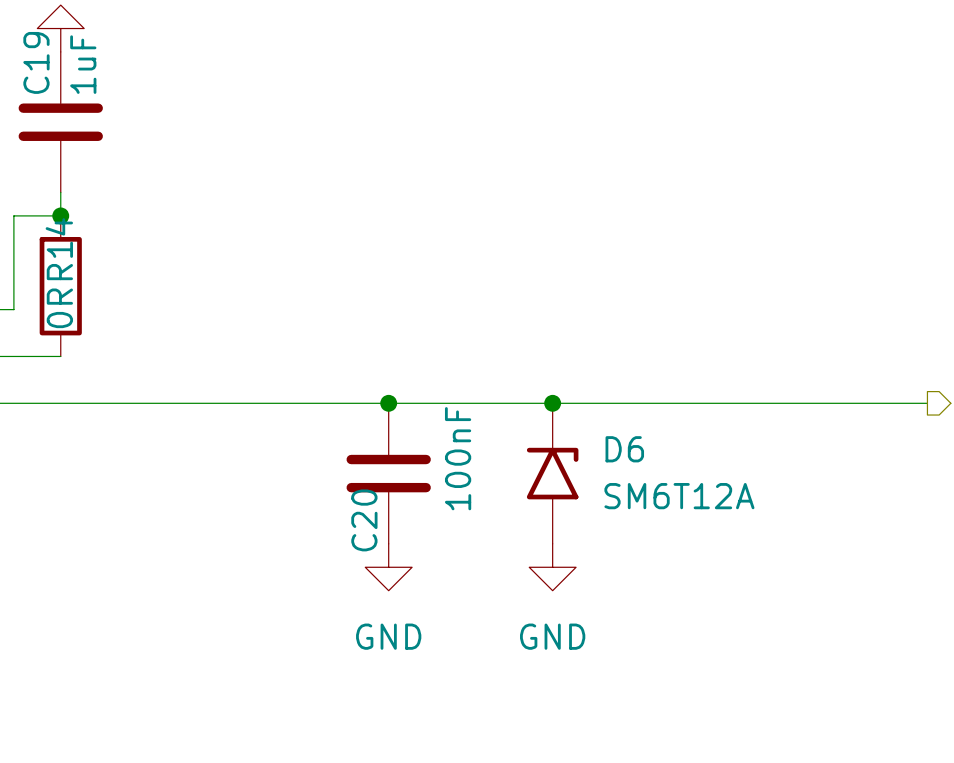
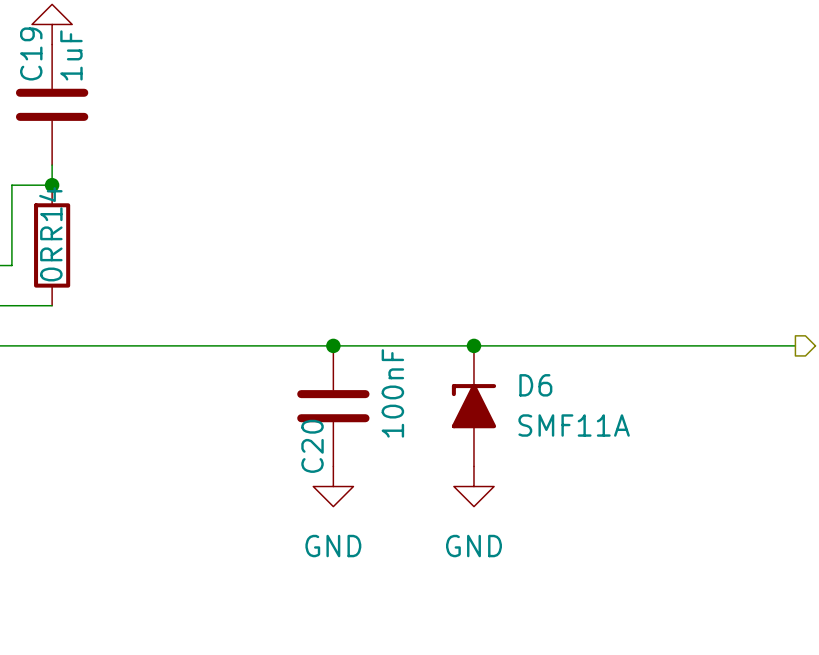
D6 symbol: [526, 403, 579, 544] -> [451, 345, 497, 467]
D6 value: SM6T12A (679, 496) -> SMF11A (574, 425)

